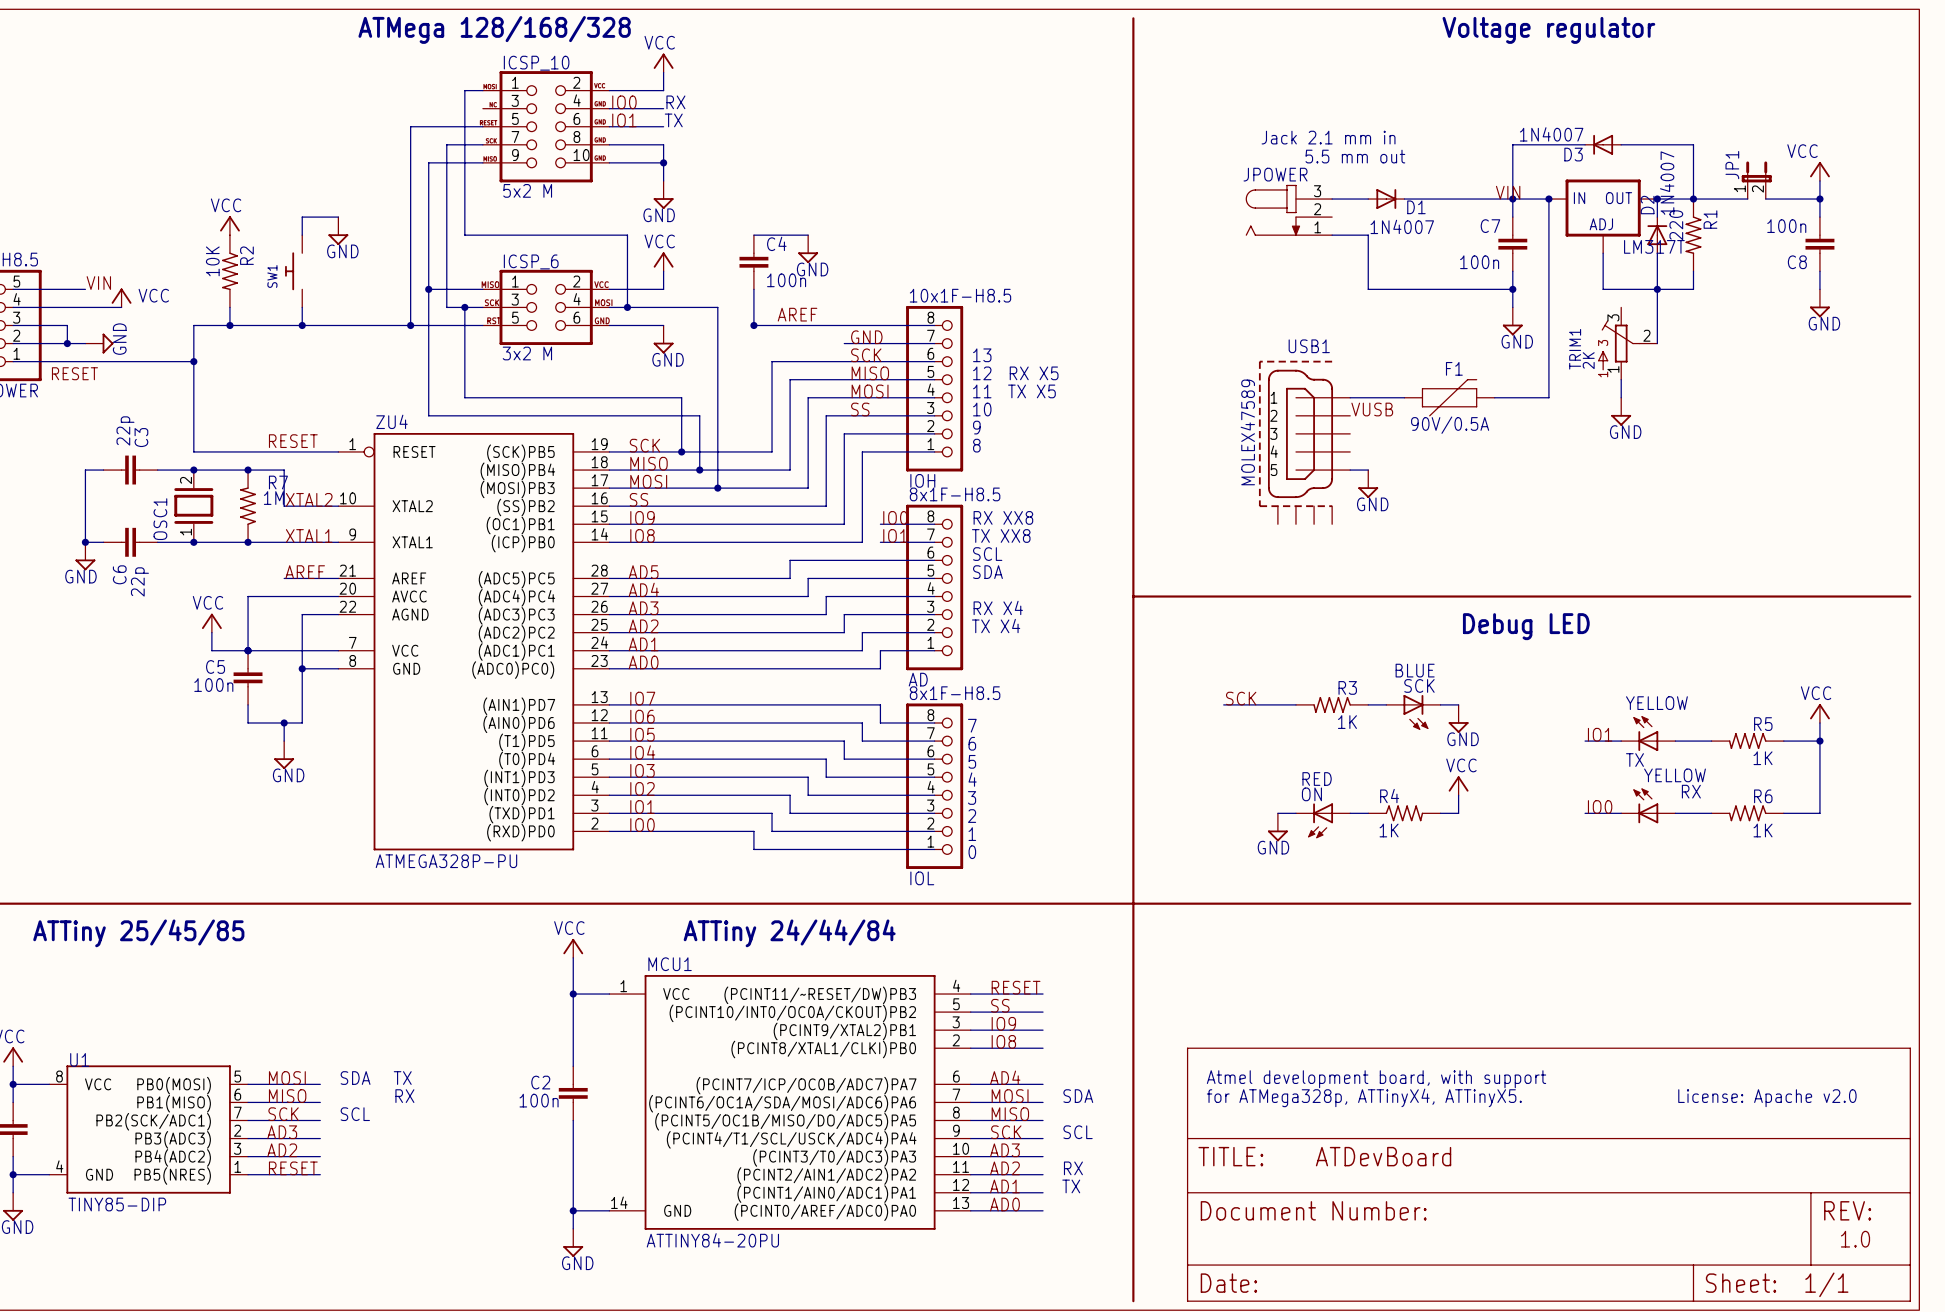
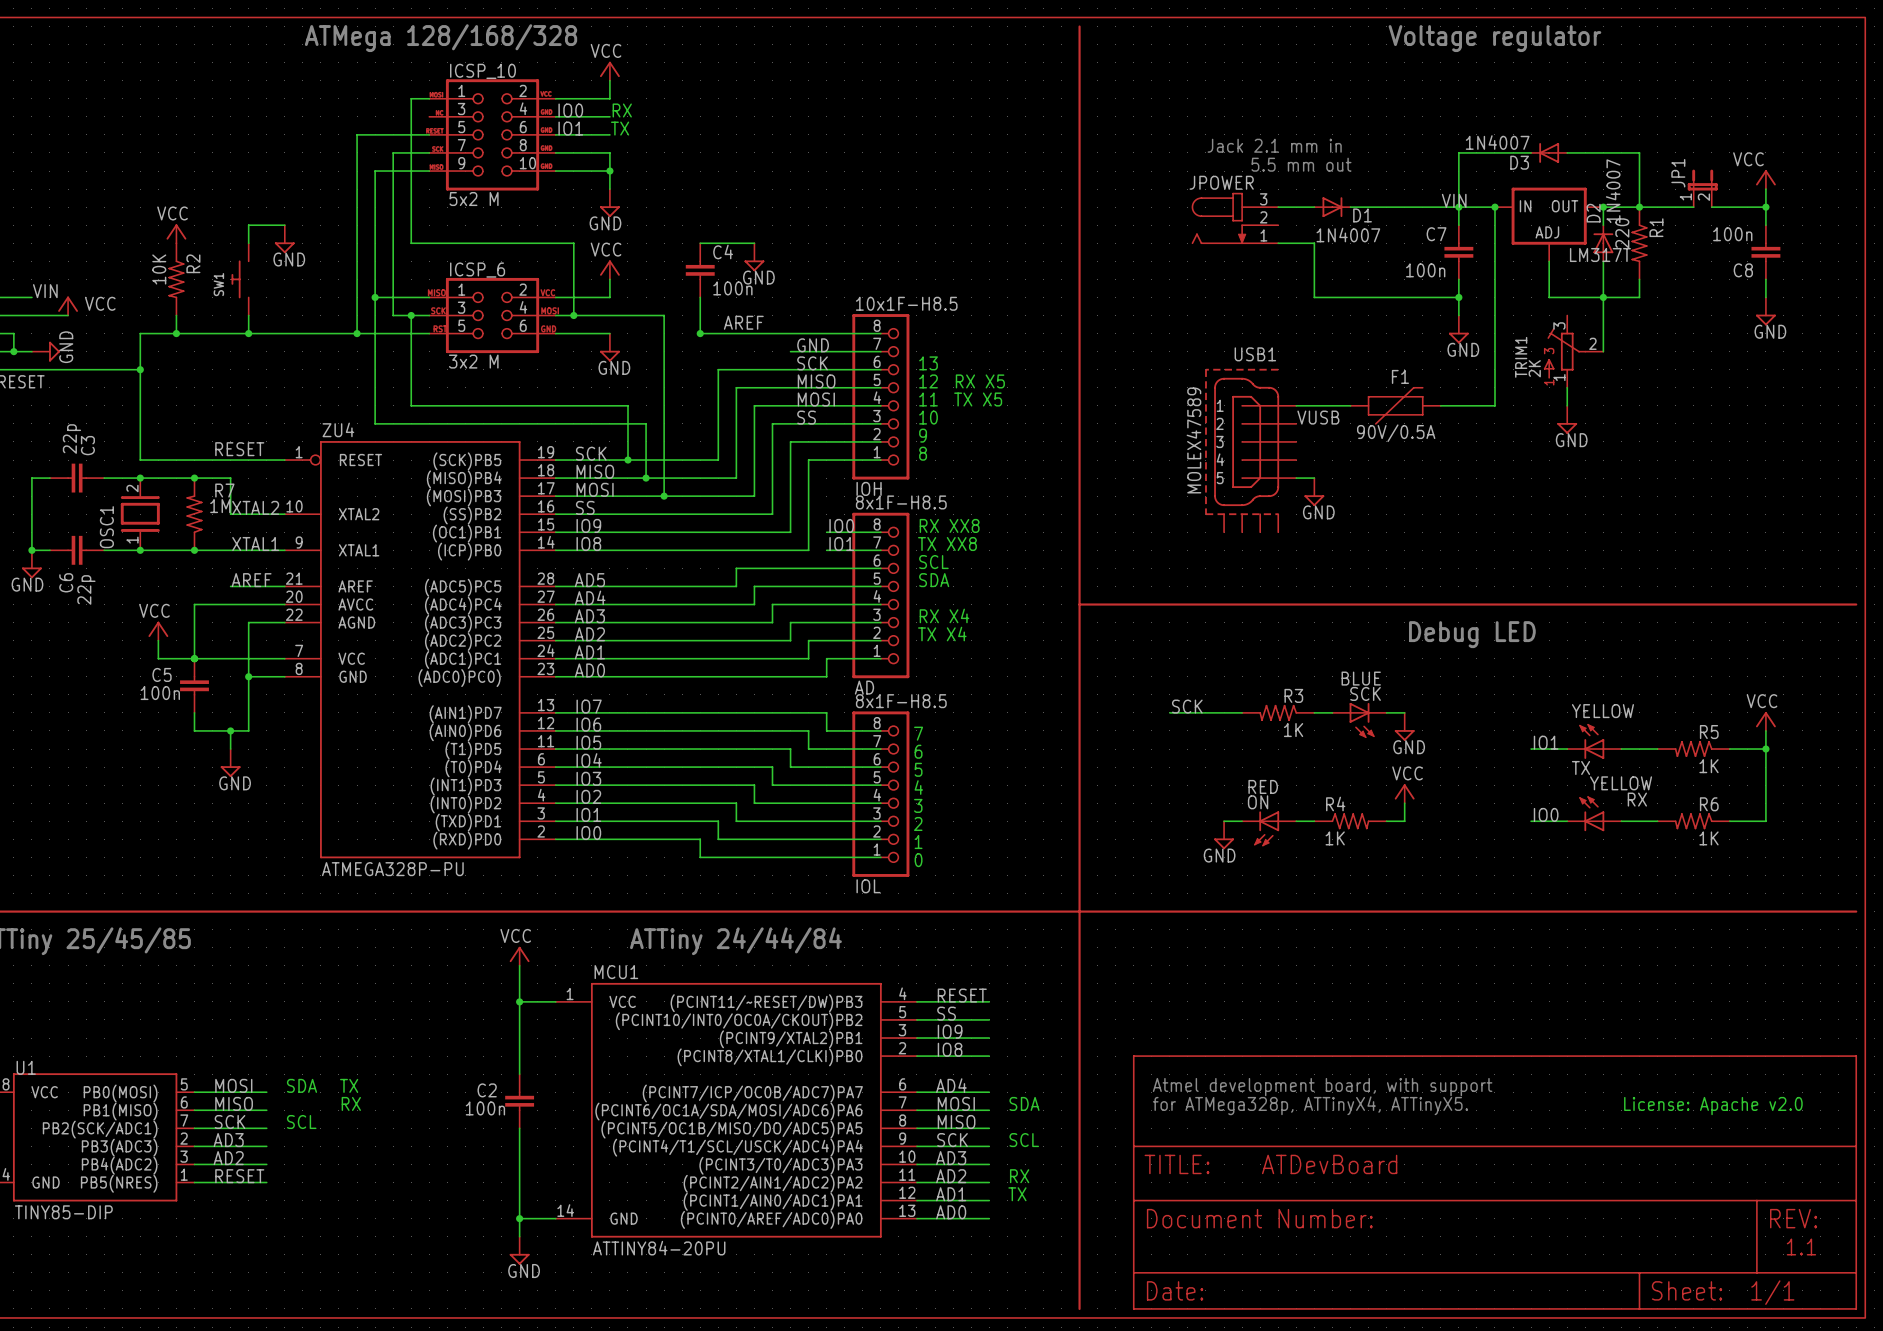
text: 1.0 (1855, 1239) -> 1.1 (1801, 1247)

